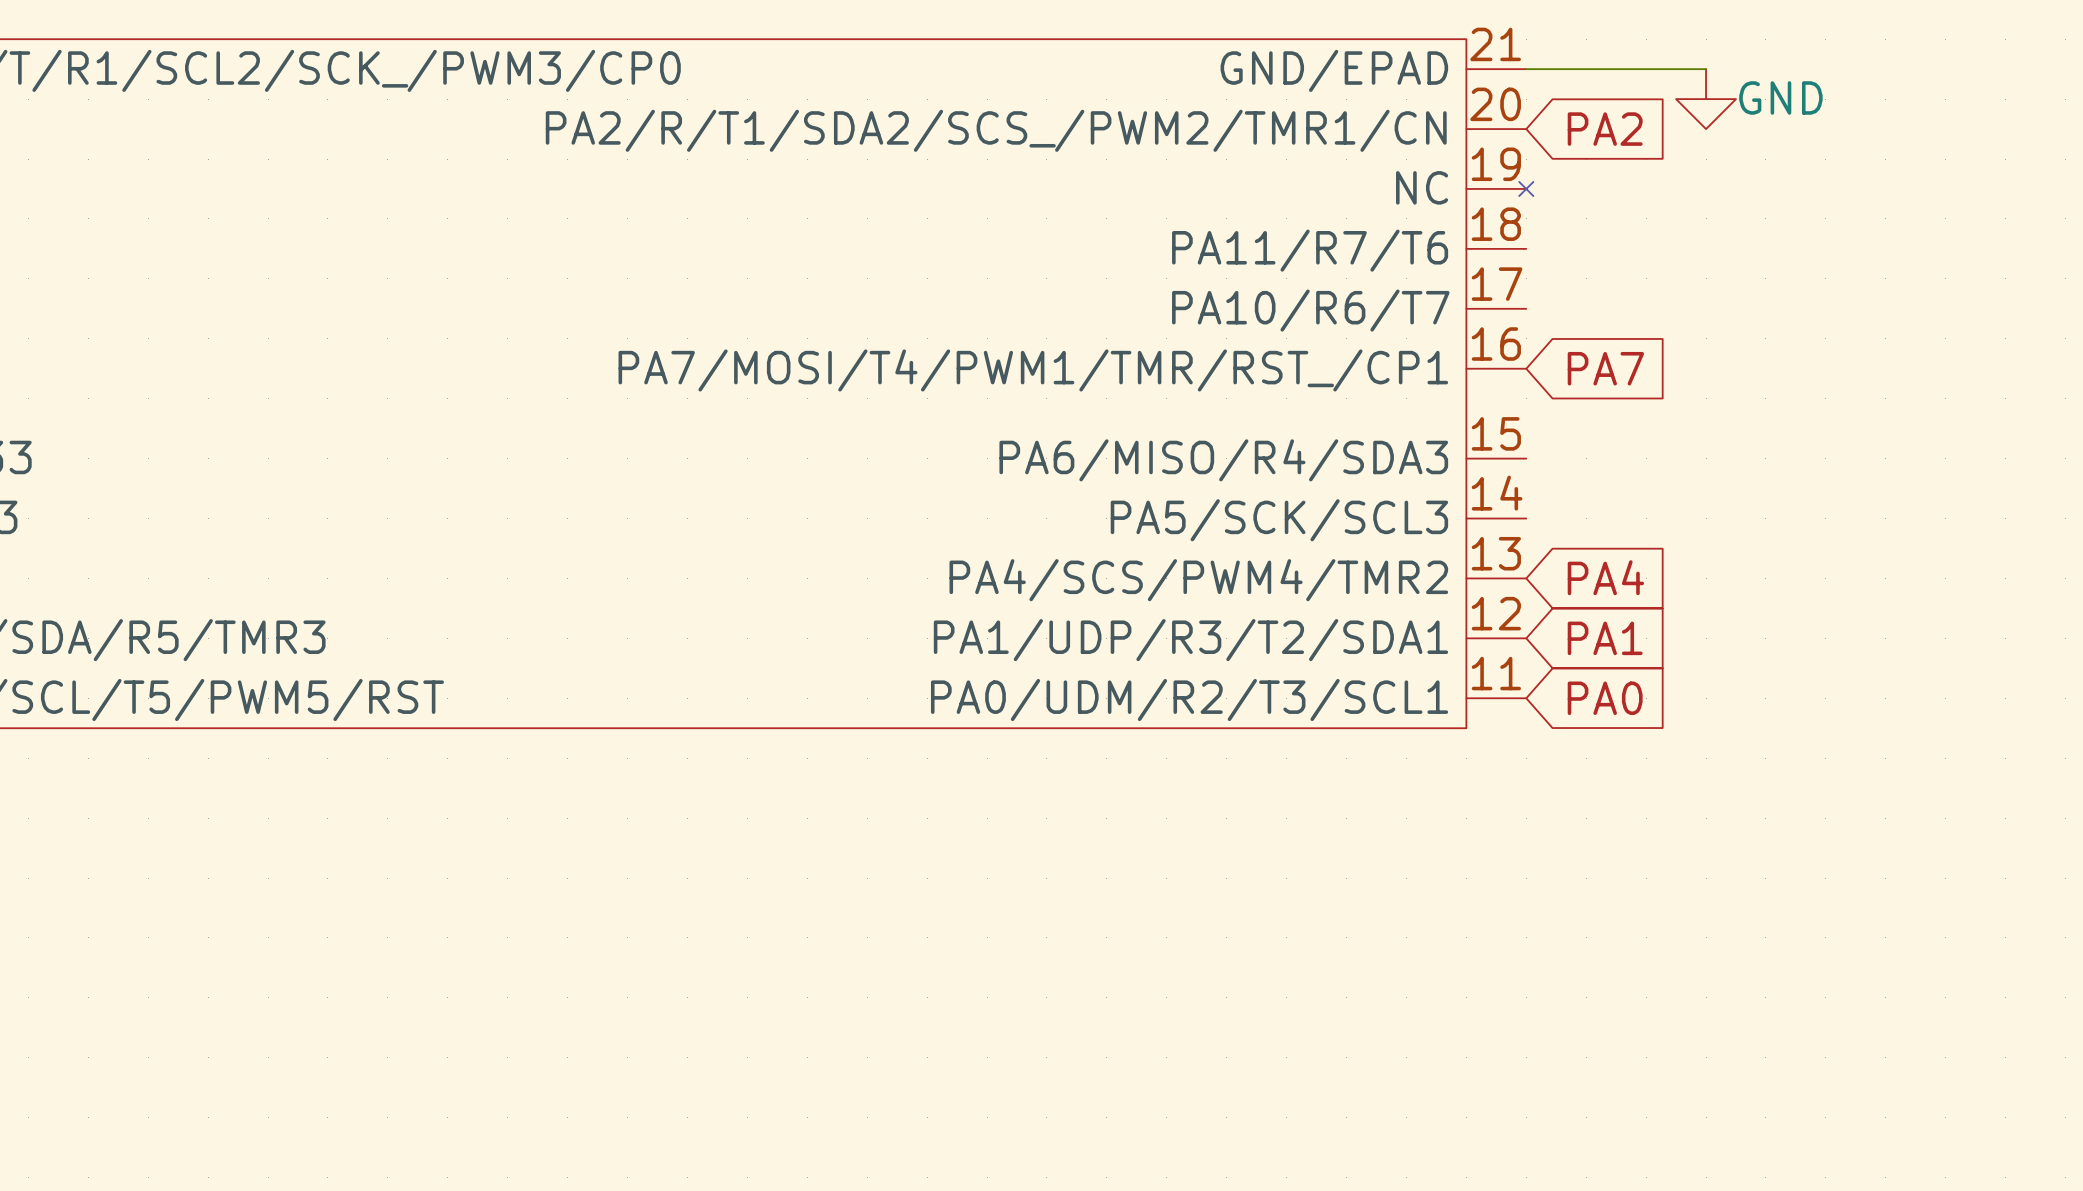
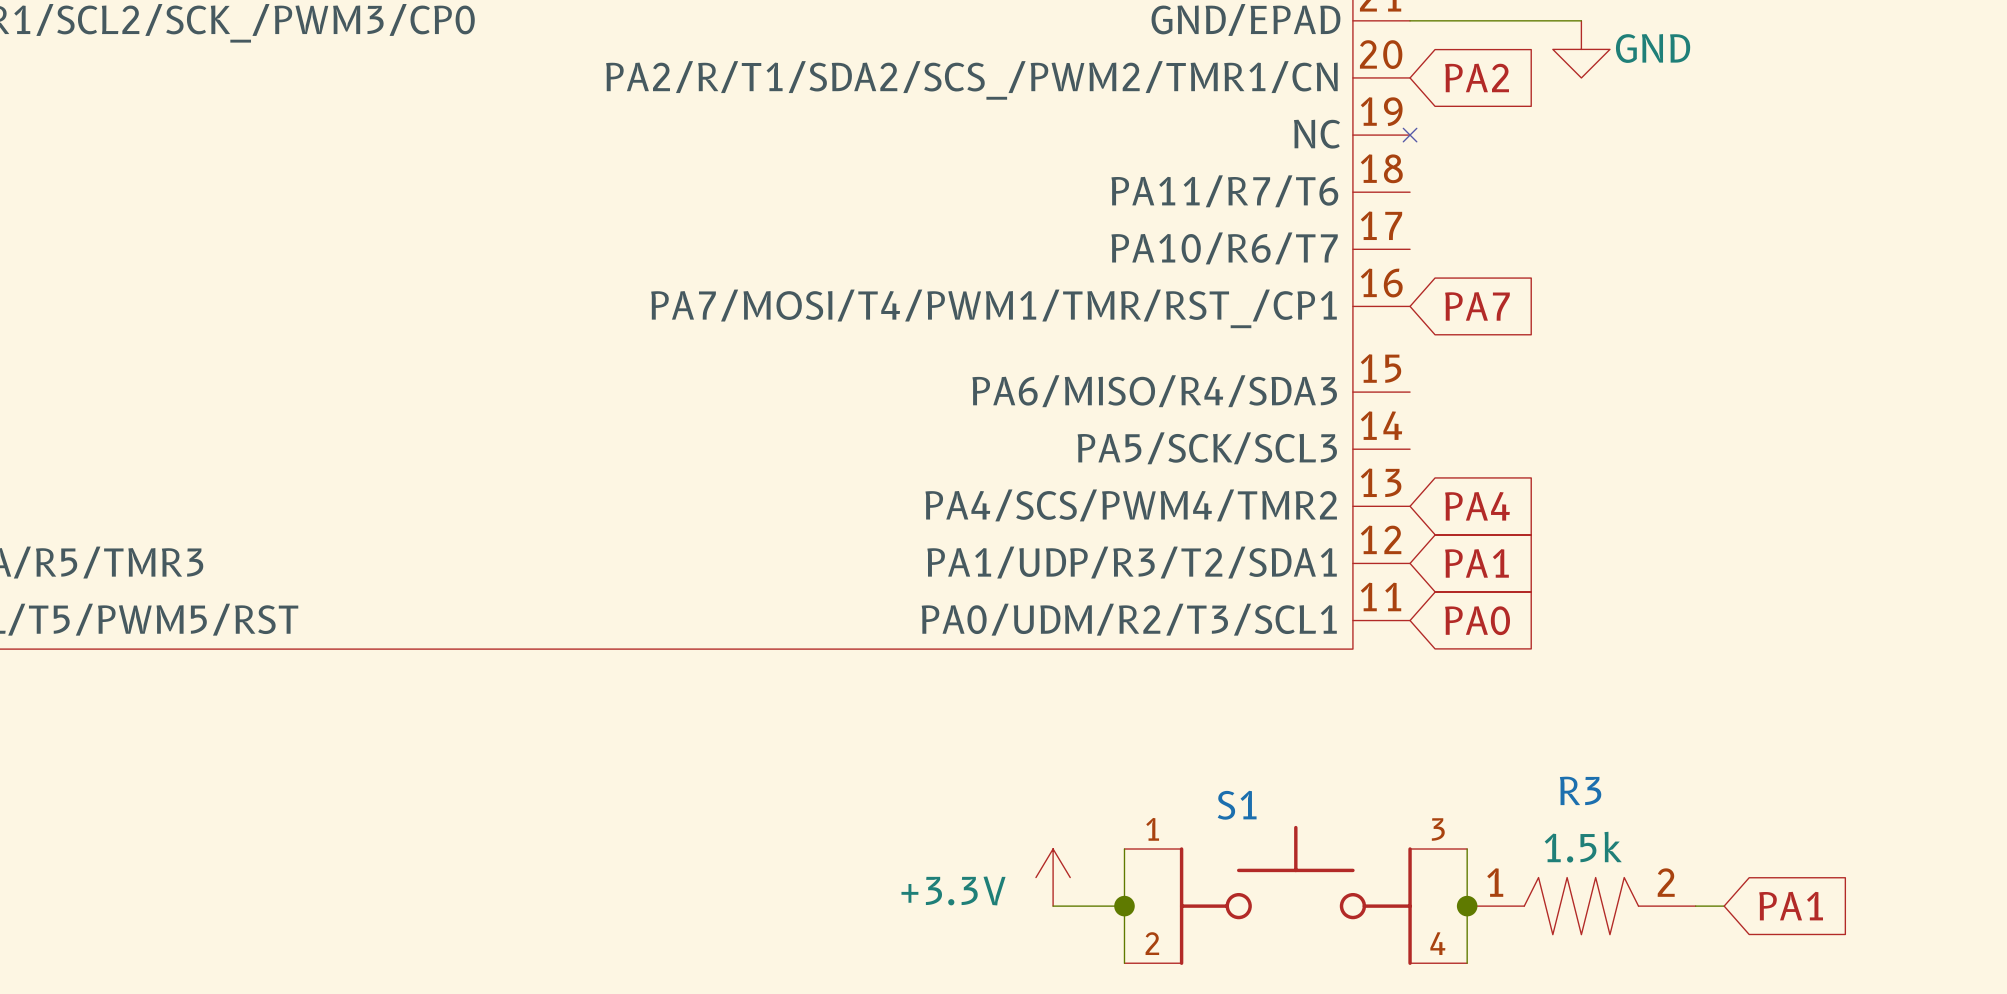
wire: none -> (1124, 849) (1124, 963)
wire: none -> (1467, 849) (1467, 963)
power symbol: none -> +3.3V (1053, 877)
S1: none -> (1295, 895)
wire: none -> (1053, 906) (1124, 906)
junction: none -> (1124, 906)
junction: none -> (1467, 906)
R3: none -> 1.5k (1581, 906)
wire: none -> (1695, 906) (1724, 906)
global label: none -> PA1 (1791, 906)

